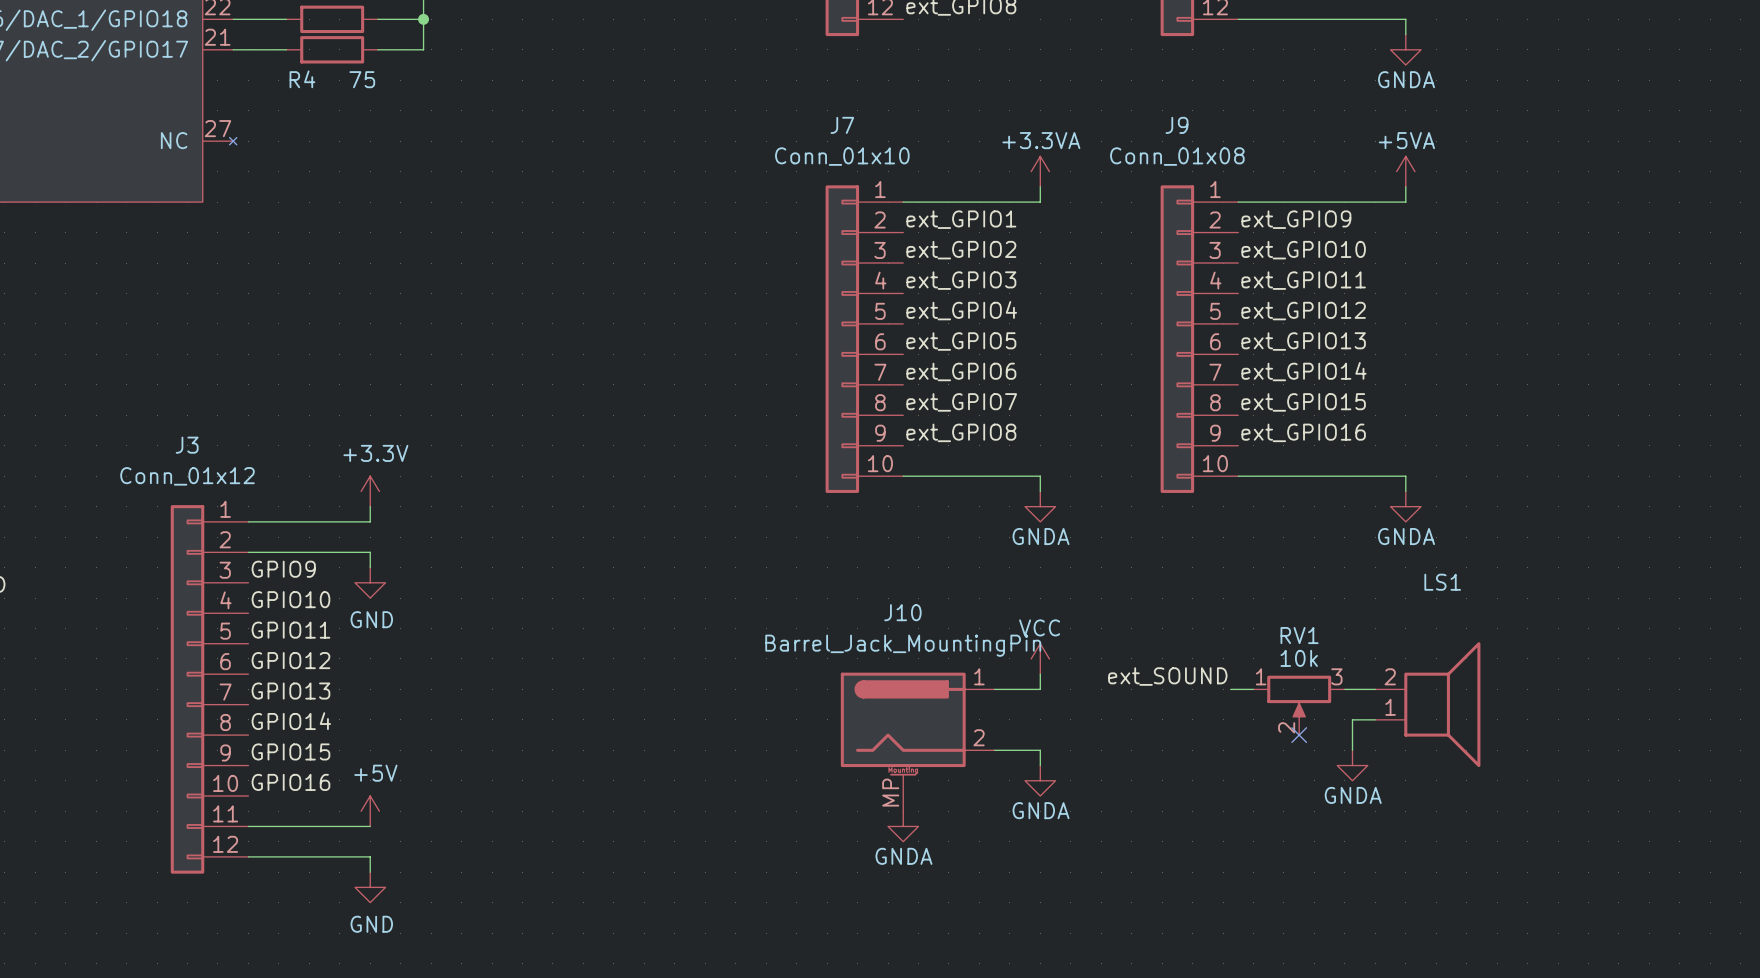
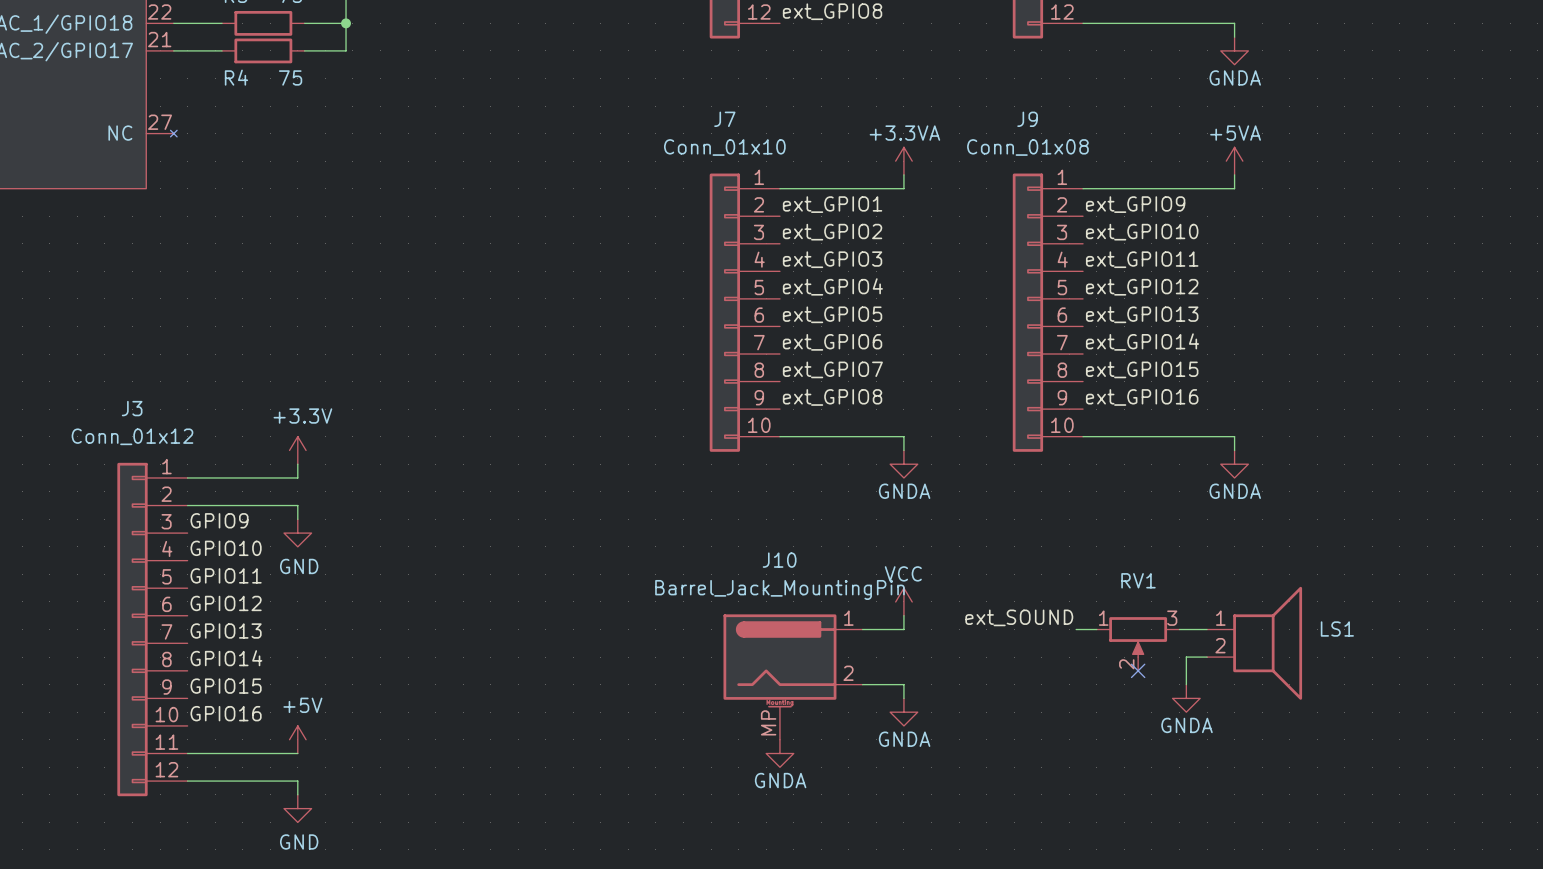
LS1 name position: LS1 (1442, 582) -> LS1 (1337, 629)
RV1 value: 10k (1299, 658) -> none
LS1 flip: as is (1442, 704) -> up-down (1267, 643)

